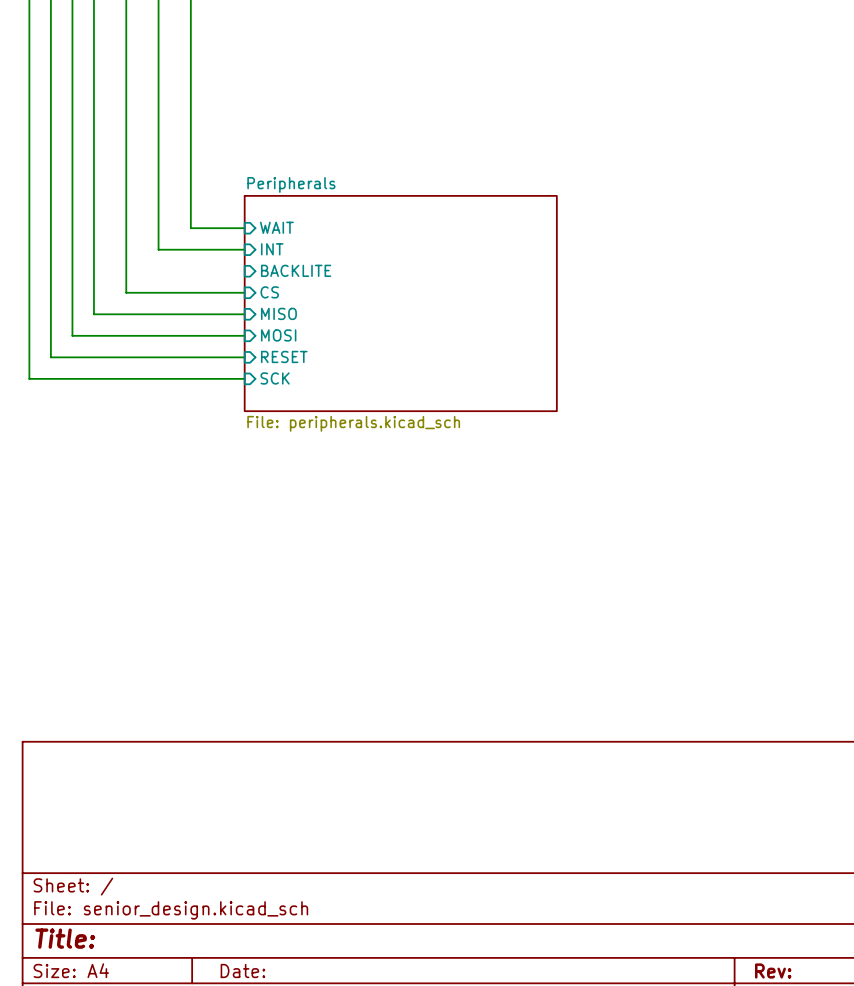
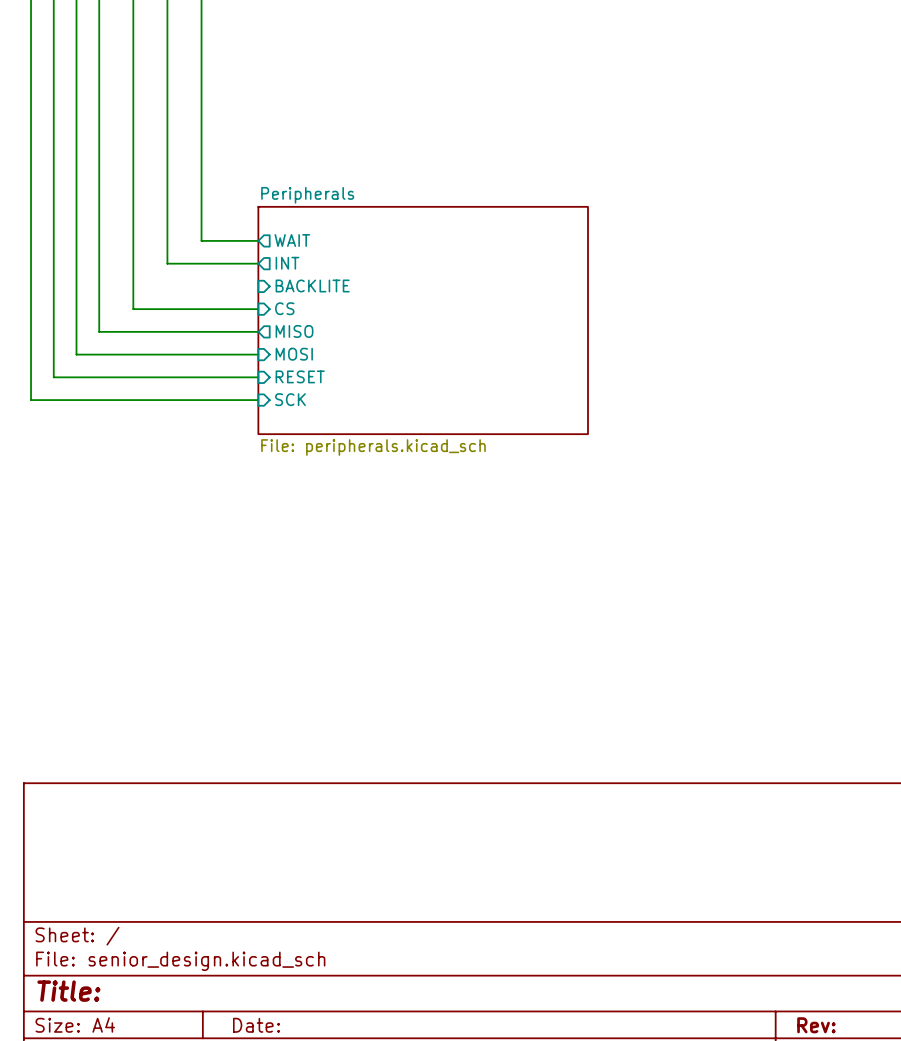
sheet pin shape: input (276, 227) -> output (292, 240)
sheet pin shape: input (272, 249) -> output (287, 263)
sheet pin shape: input (278, 313) -> output (294, 331)

